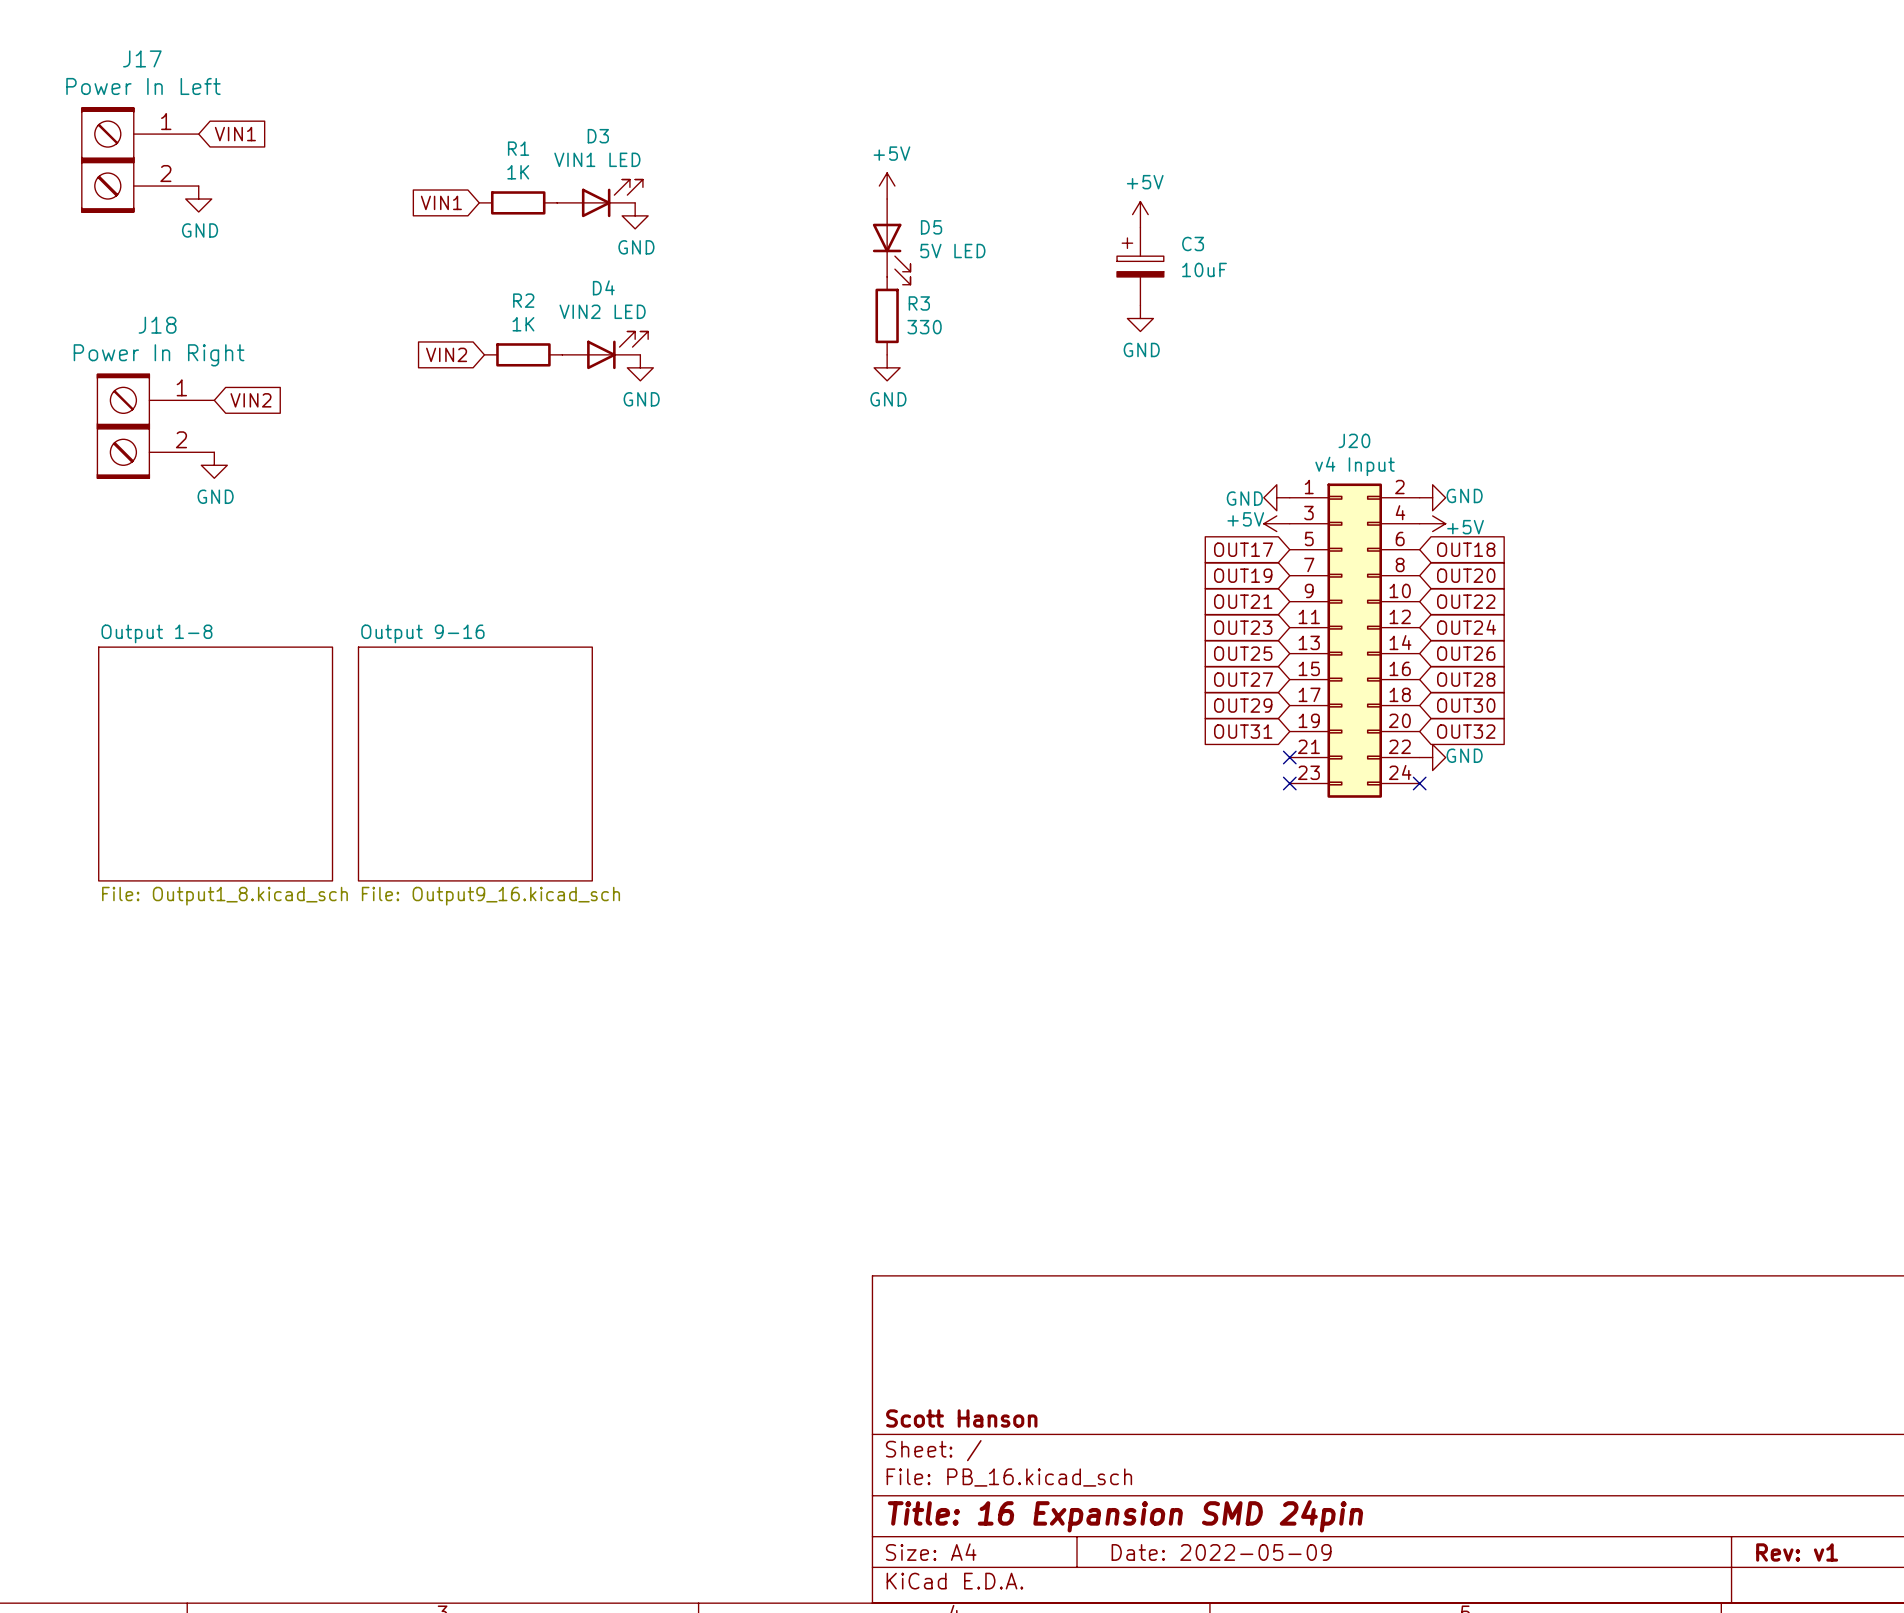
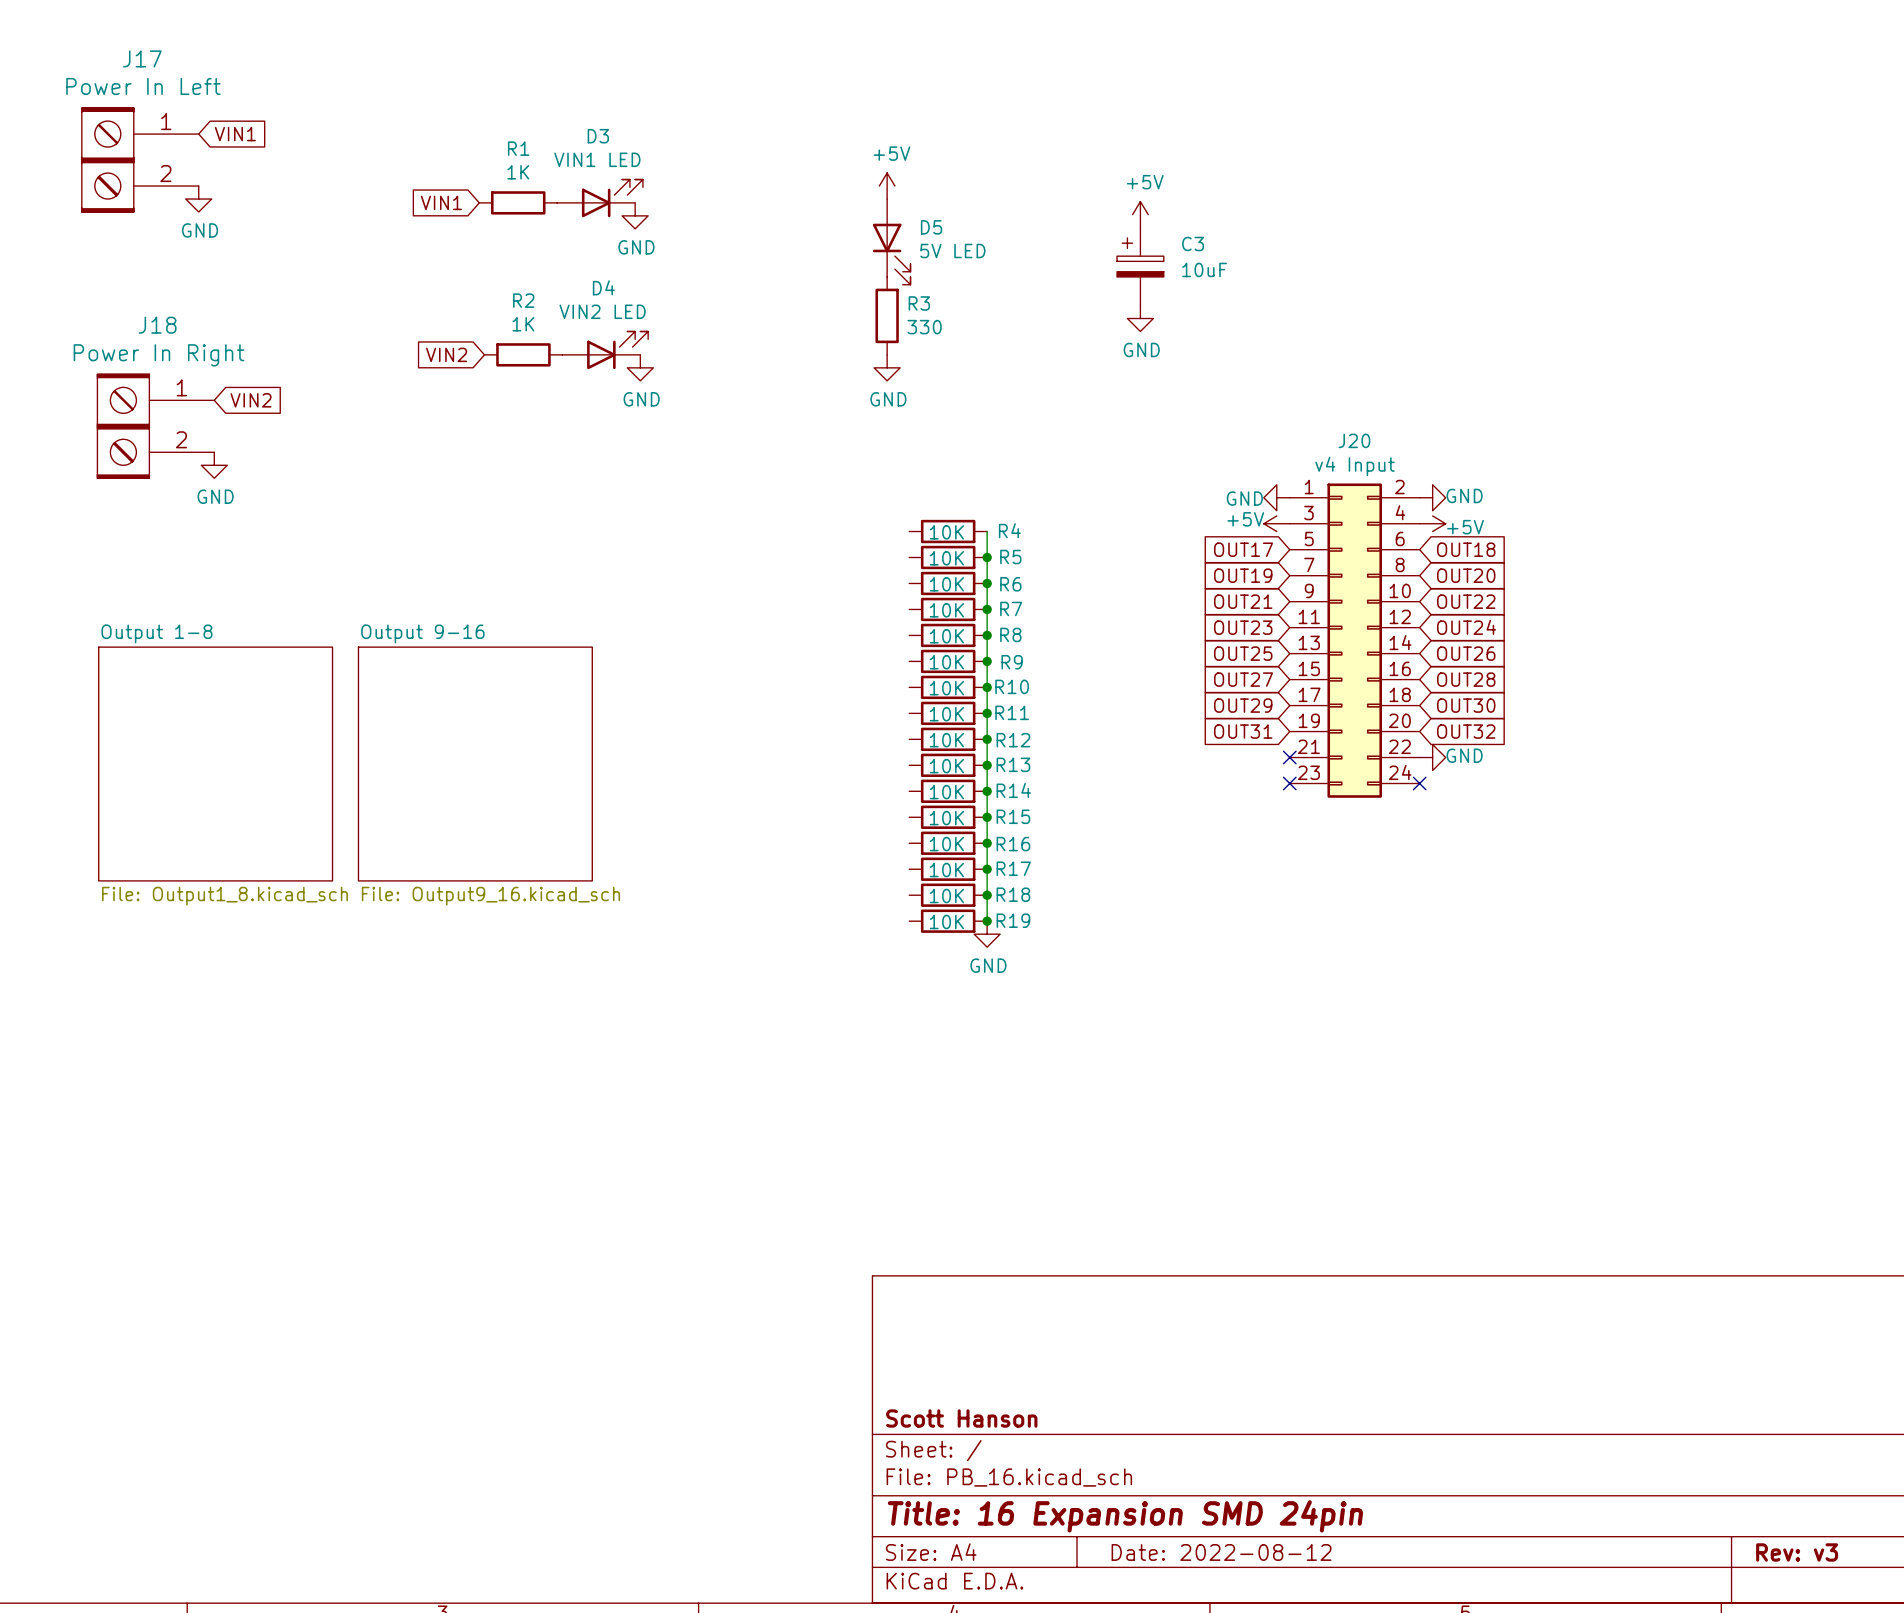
R4: none -> 10K (948, 531)
wire: none -> (987, 531) (987, 921)
R5: none -> 10K (948, 557)
junction: none -> (987, 557)
R6: none -> 10K (948, 583)
junction: none -> (987, 583)
R7: none -> 10K (948, 609)
junction: none -> (987, 609)
R8: none -> 10K (948, 635)
junction: none -> (987, 635)
R9: none -> 10K (948, 661)
junction: none -> (987, 661)
R10: none -> 10K (948, 687)
junction: none -> (987, 687)
R11: none -> 10K (948, 713)
junction: none -> (987, 713)
R12: none -> 10K (948, 739)
junction: none -> (987, 739)
R13: none -> 10K (948, 765)
junction: none -> (987, 765)
R14: none -> 10K (948, 791)
junction: none -> (987, 791)
R15: none -> 10K (948, 817)
junction: none -> (987, 817)
R16: none -> 10K (948, 843)
junction: none -> (987, 843)
R17: none -> 10K (948, 869)
junction: none -> (987, 869)
R18: none -> 10K (948, 895)
junction: none -> (987, 895)
R19: none -> 10K (948, 921)
junction: none -> (987, 921)
power symbol: none -> GND (987, 934)
title block: Date: 2022-05-09 (1221, 1552) -> Date: 2022-08-12 (1221, 1552)
title block: Rev: v1 (1797, 1552) -> Rev: v3 (1797, 1552)

